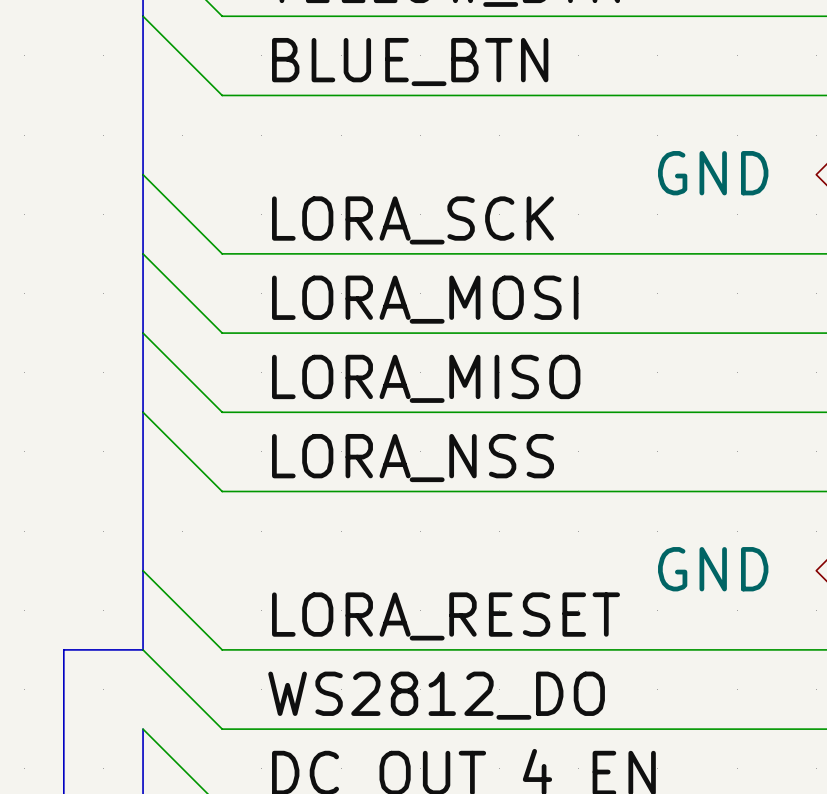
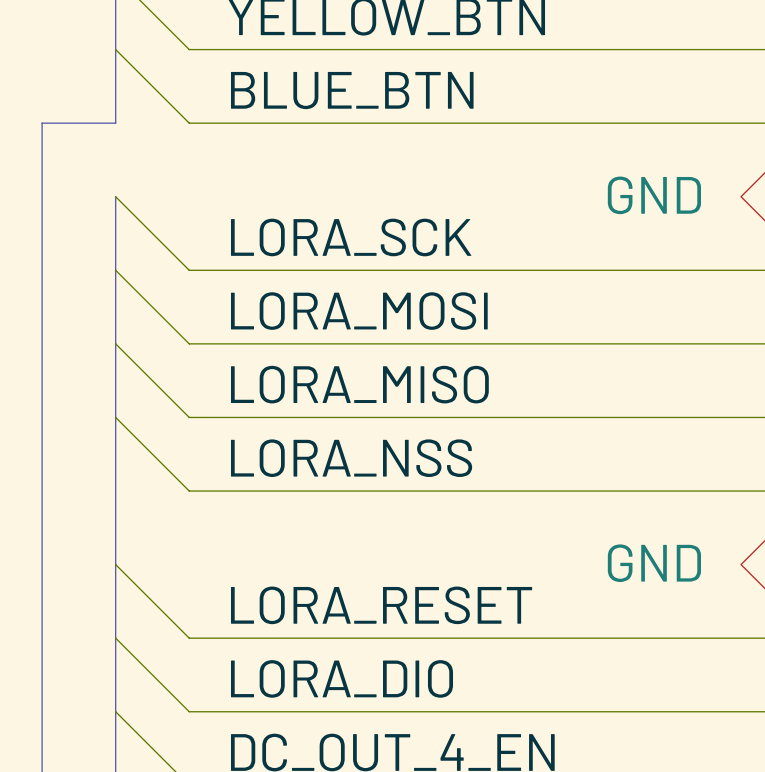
bus: (143, 95) (143, 174) -> (115, 123) (42, 123) (42, 638)
bus: (63, 649) (143, 649) -> (115, 711) (115, 638)
label: WS2812_DO (436, 695) -> LORA_DIO (341, 678)

